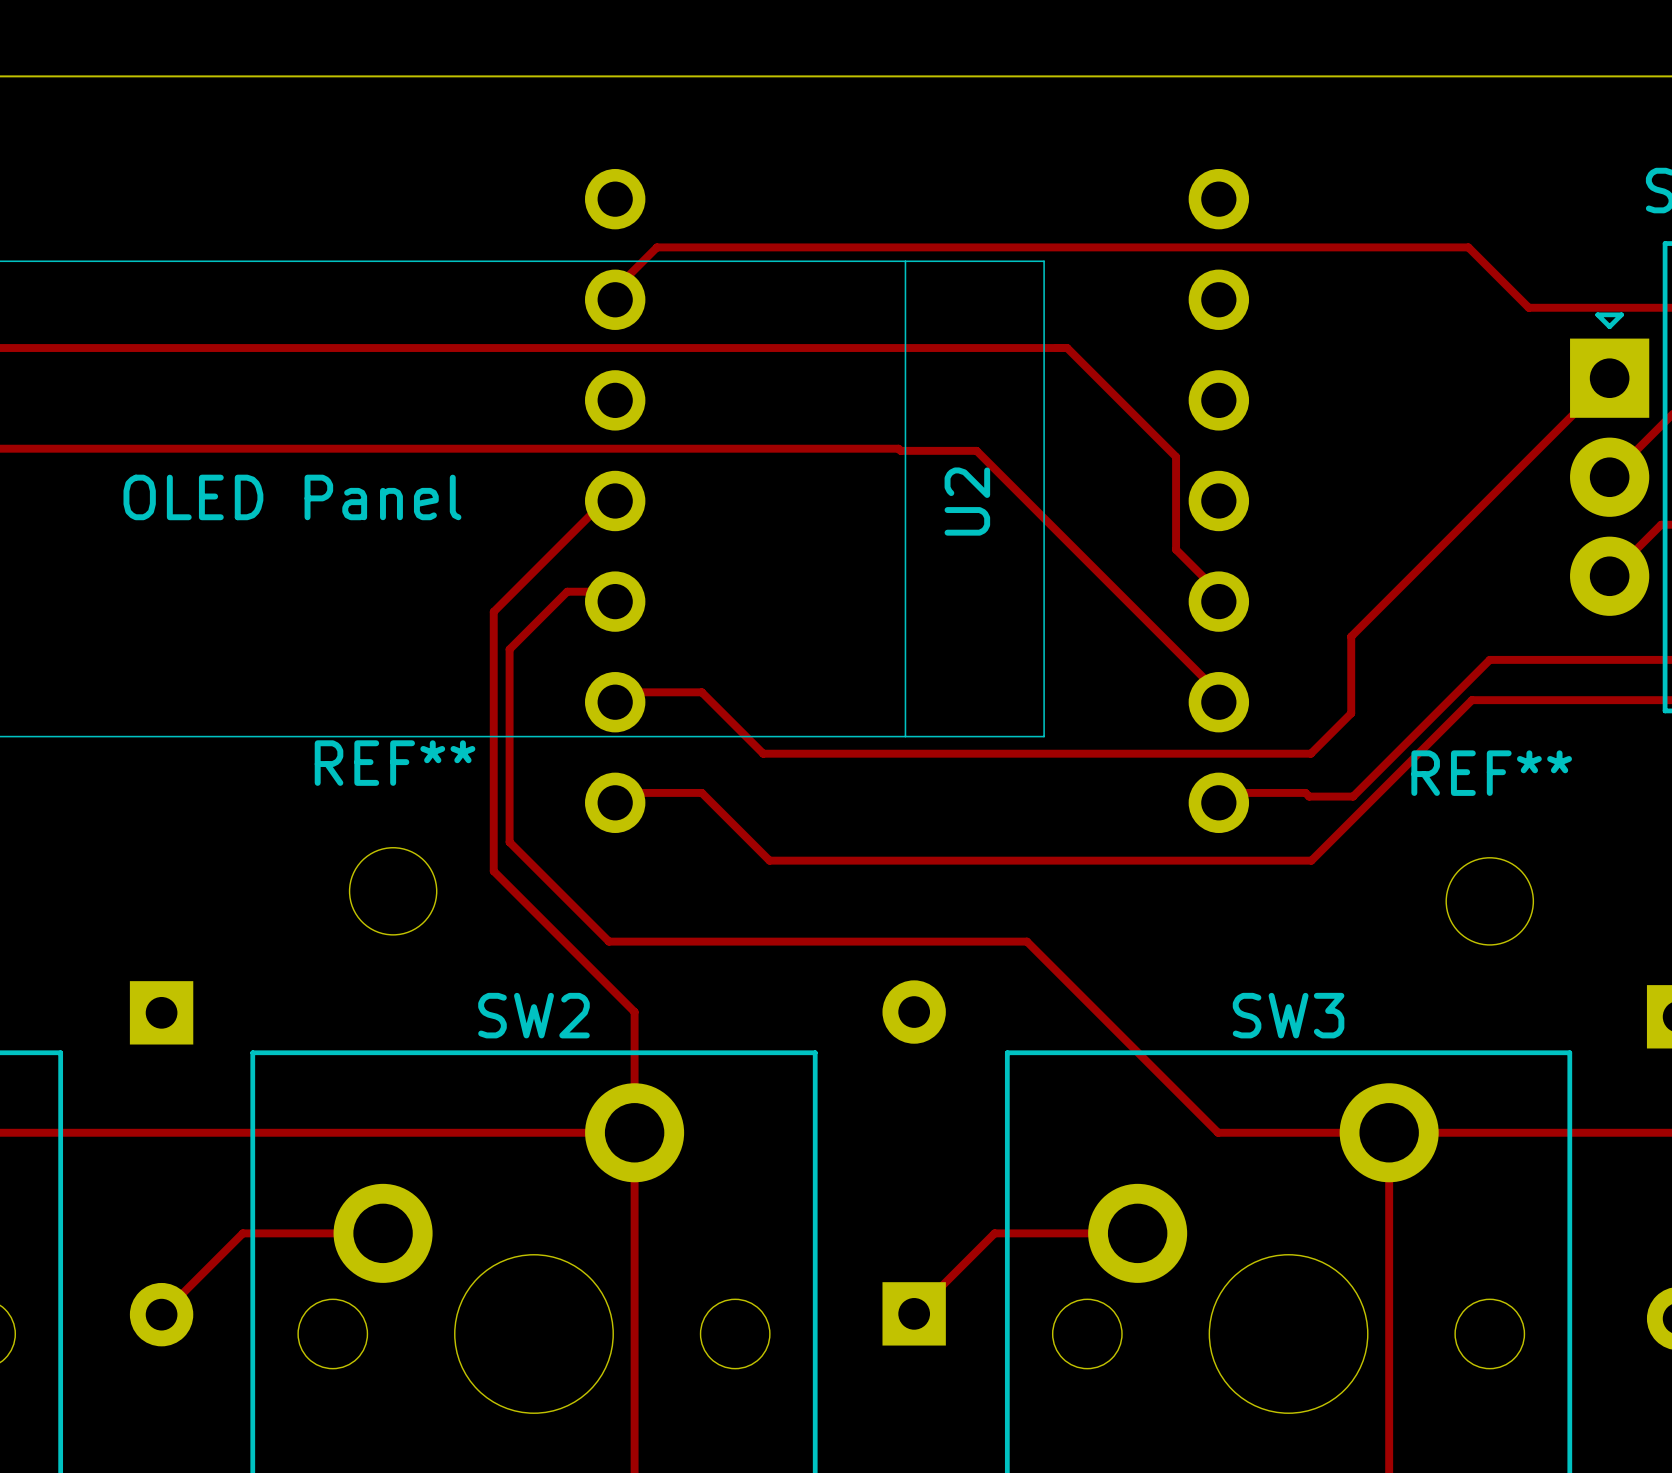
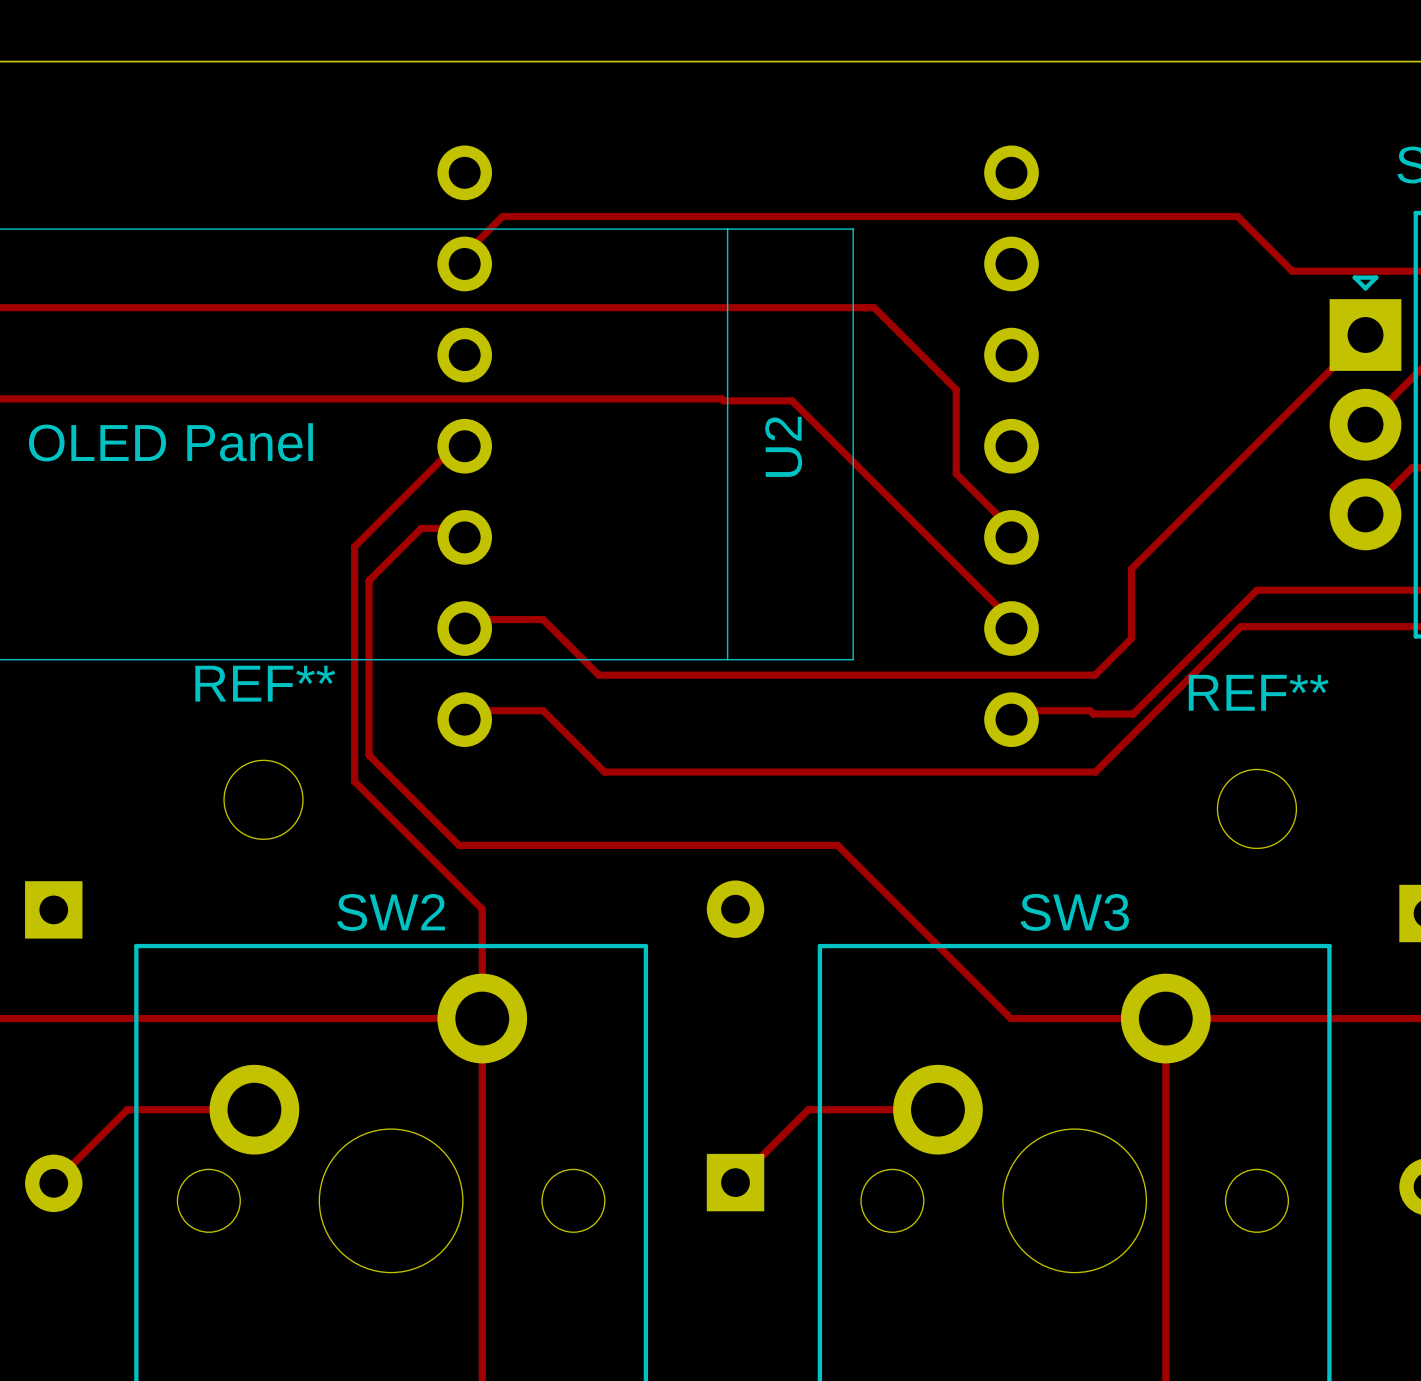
track: (1157, 438) (1176, 456) (1176, 549) -> (956, 389) (956, 473) (972, 490)

